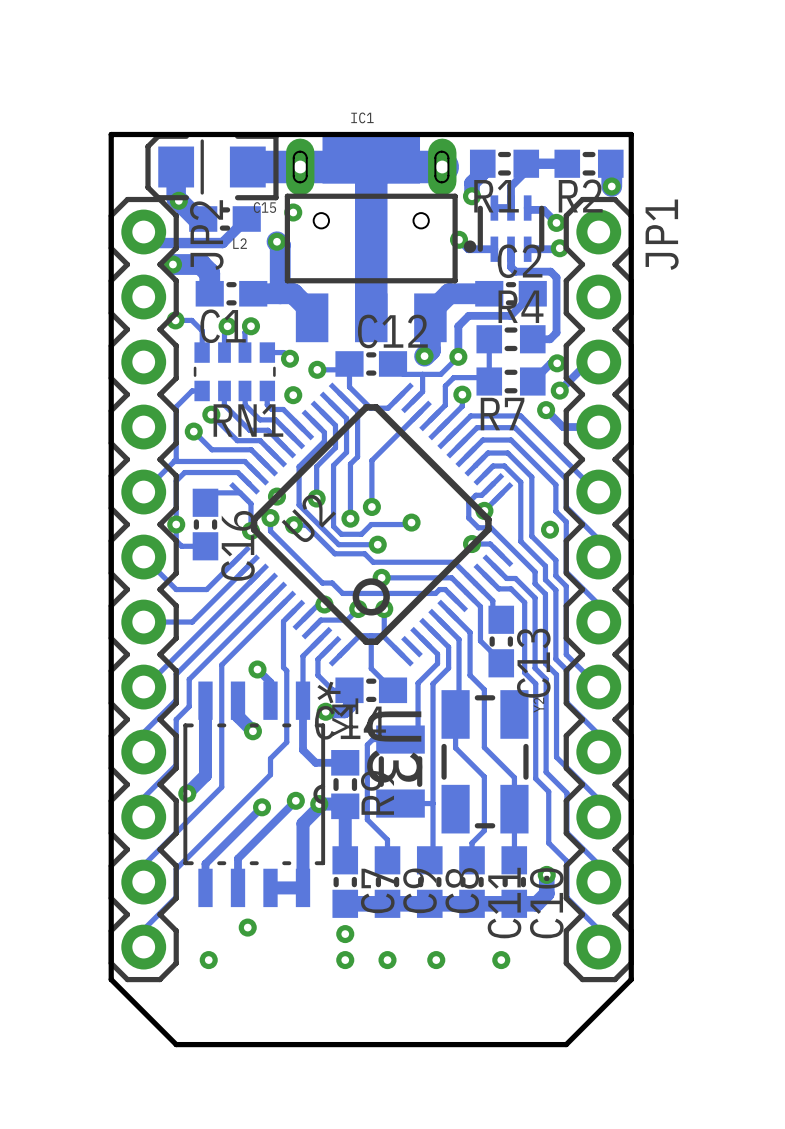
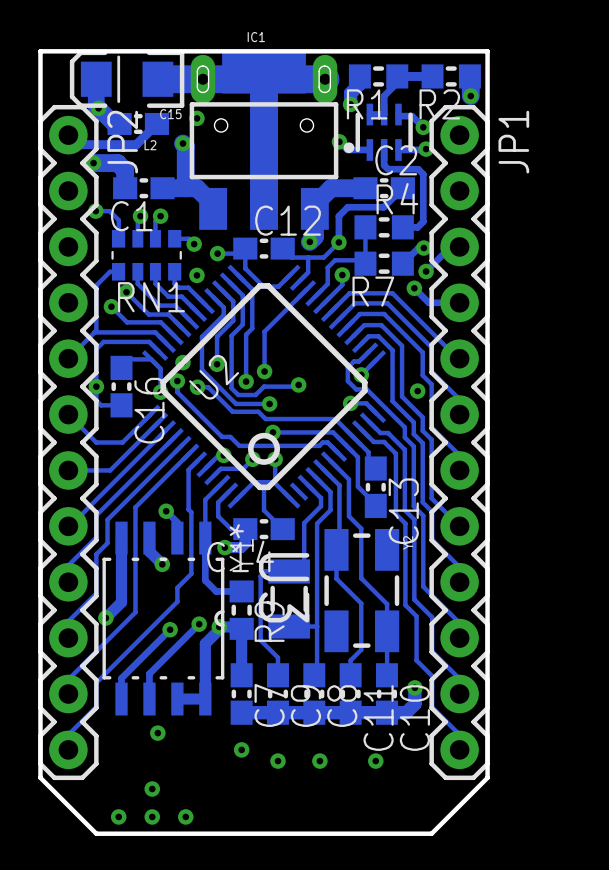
via: (345, 934) -> none
via: none -> (241, 749)
via: (208, 960) -> none
via: (345, 960) -> none
via: none -> (152, 789)
via: none -> (118, 816)
via: none -> (152, 816)
via: none -> (185, 816)

